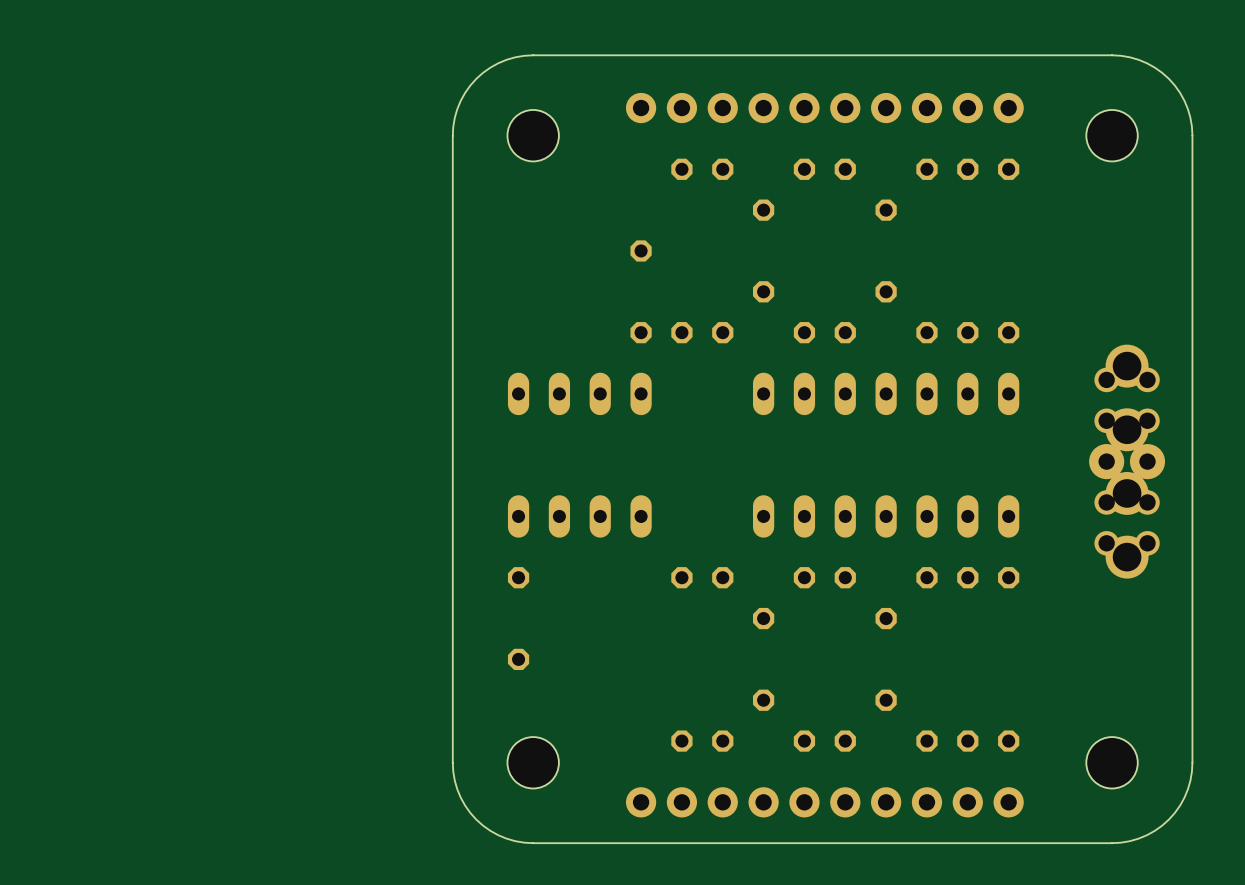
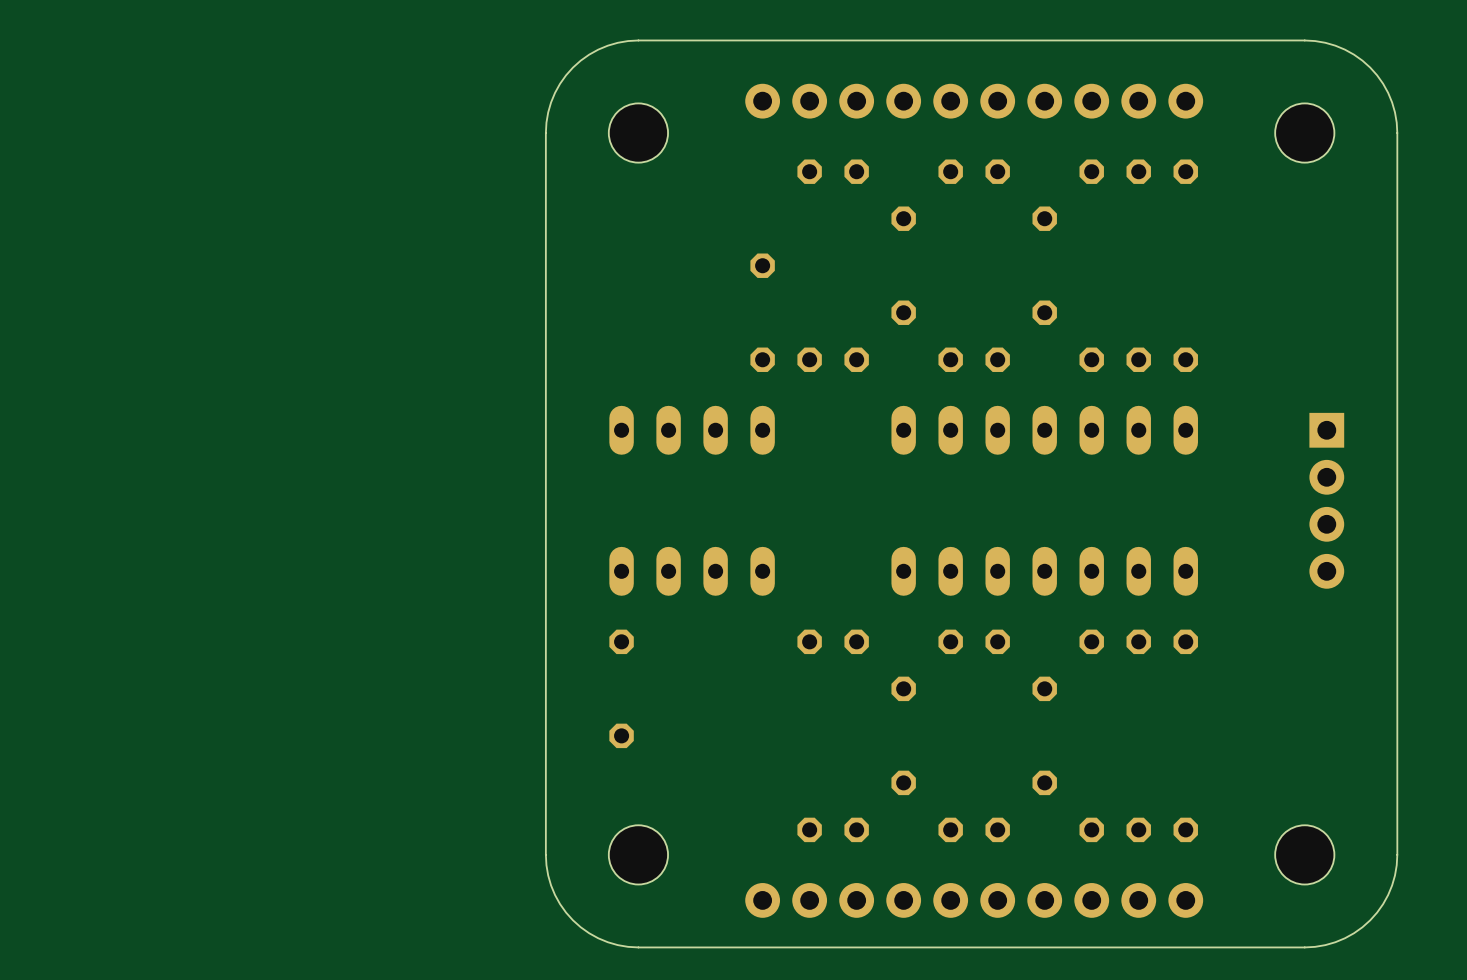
part footprint: [1089, 344, 1166, 579] -> [1309, 412, 1345, 589]

